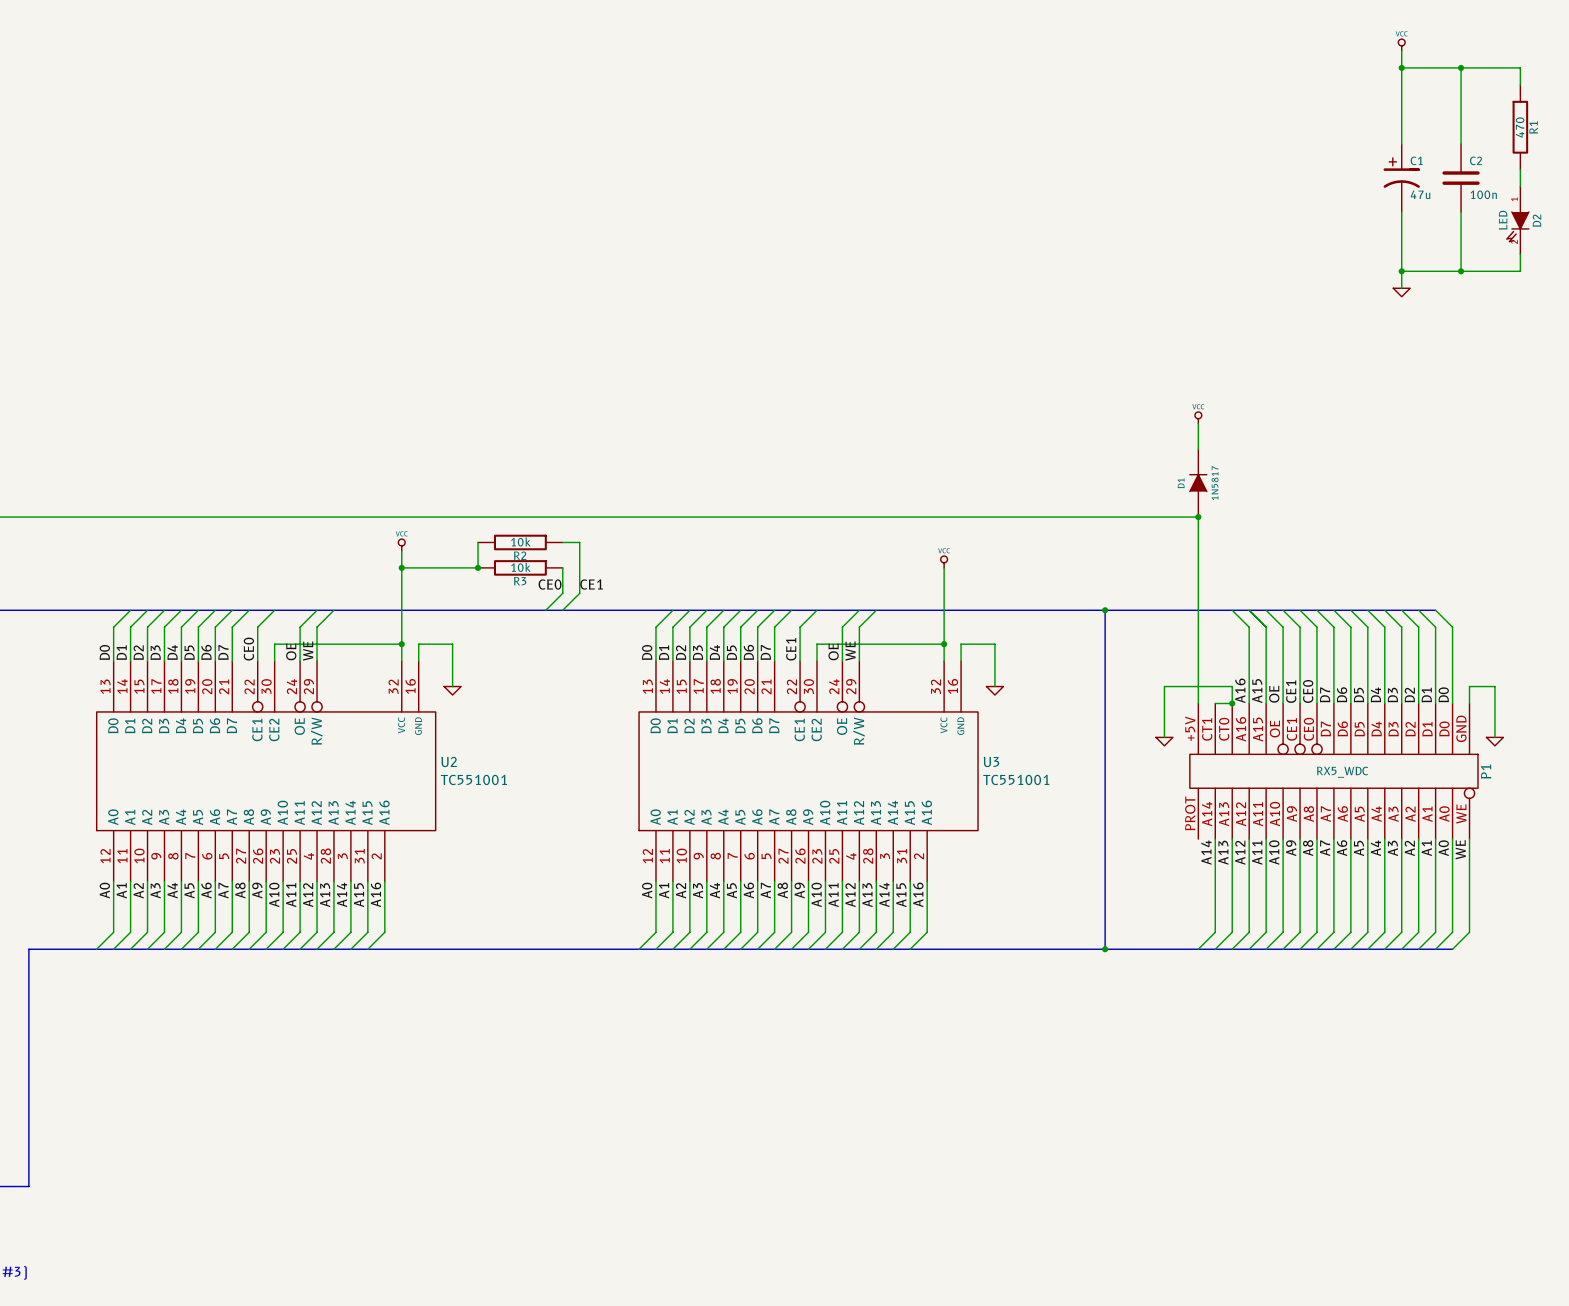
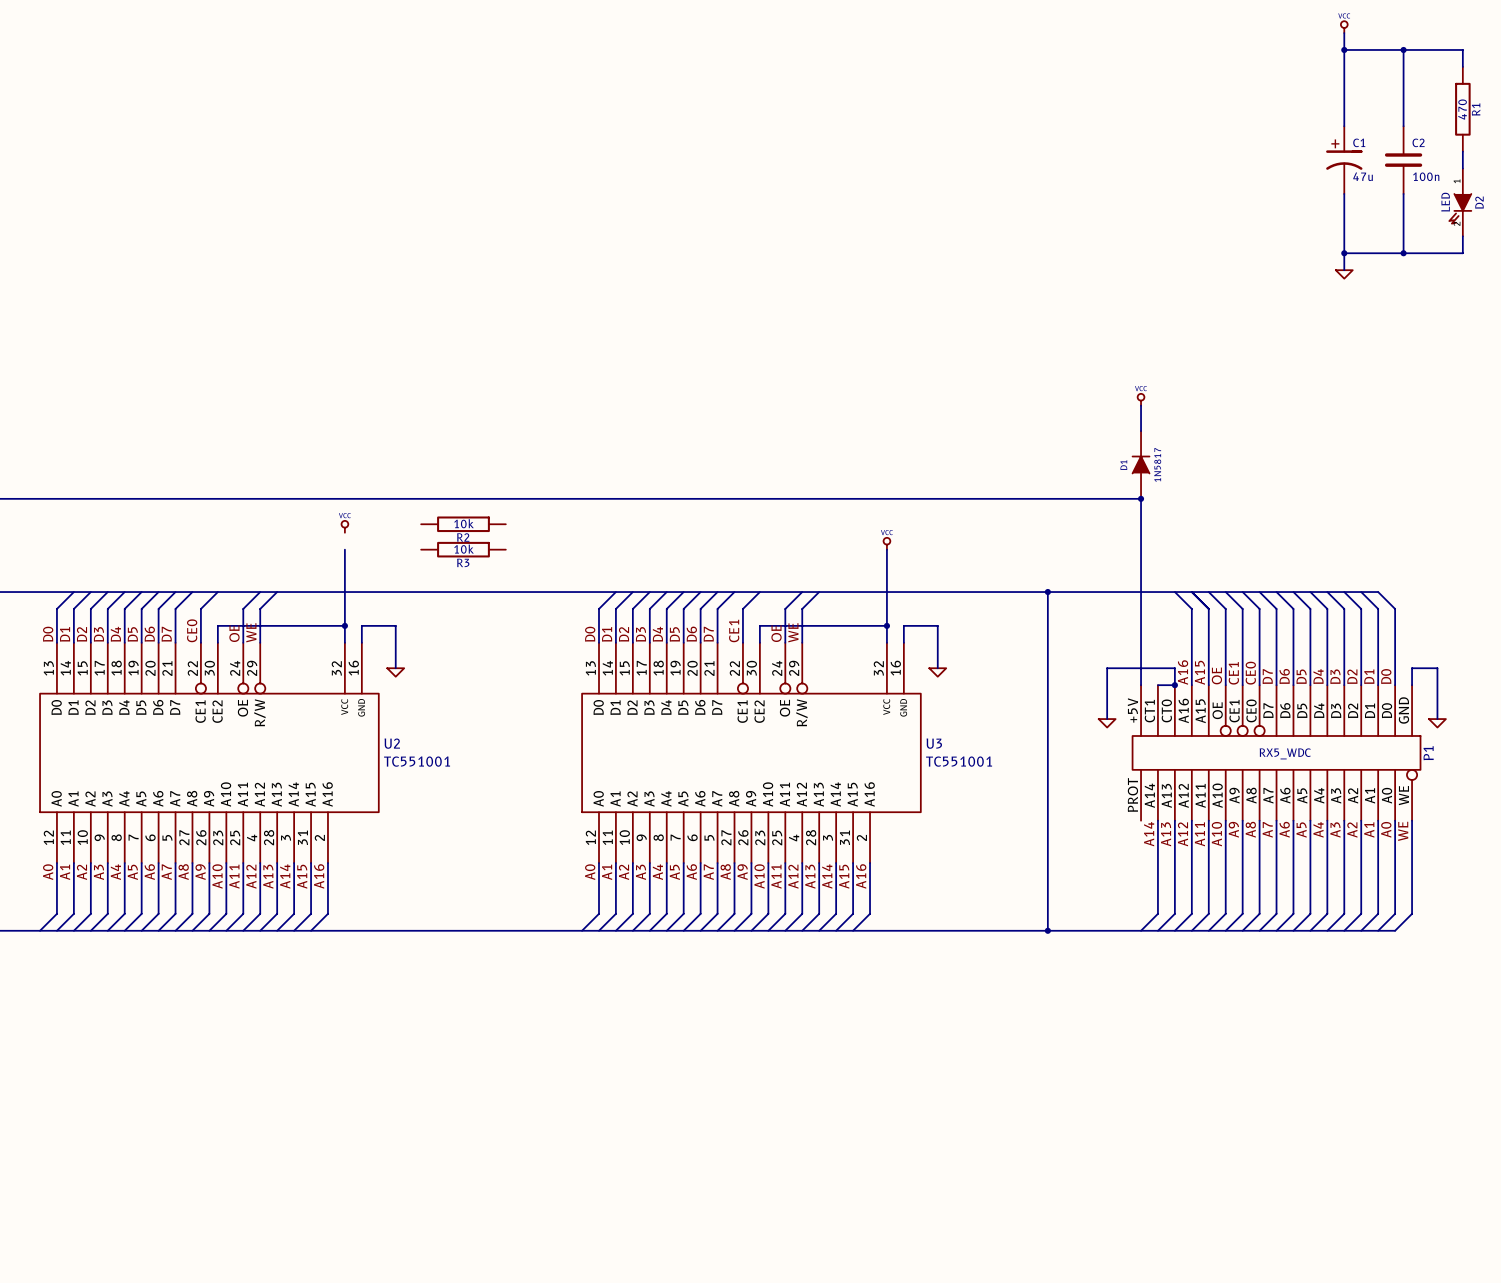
wire: (478, 542) (478, 567) (401, 567) (401, 550) -> none
wire: (562, 542) (579, 542) (579, 593) (562, 610) -> none
junction: (401, 567) -> none
junction: (478, 567) -> none
wire: (562, 567) (562, 593) (545, 610) -> none
label: CE0 (550, 584) -> none
label: CE1 (591, 584) -> none

